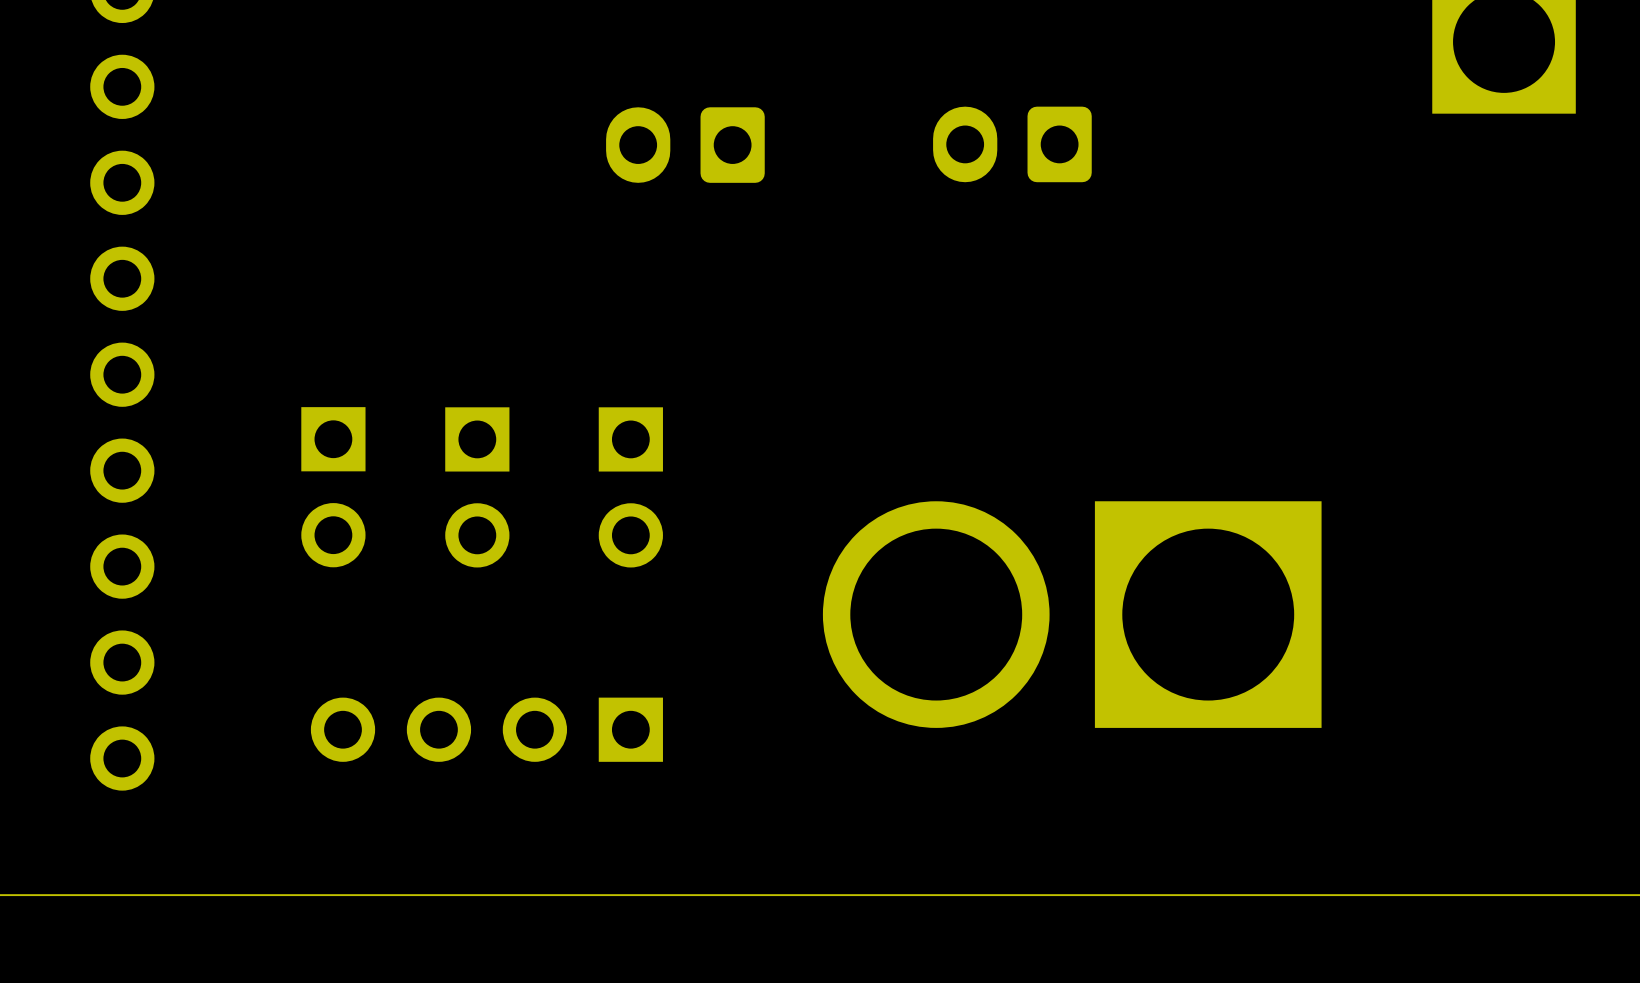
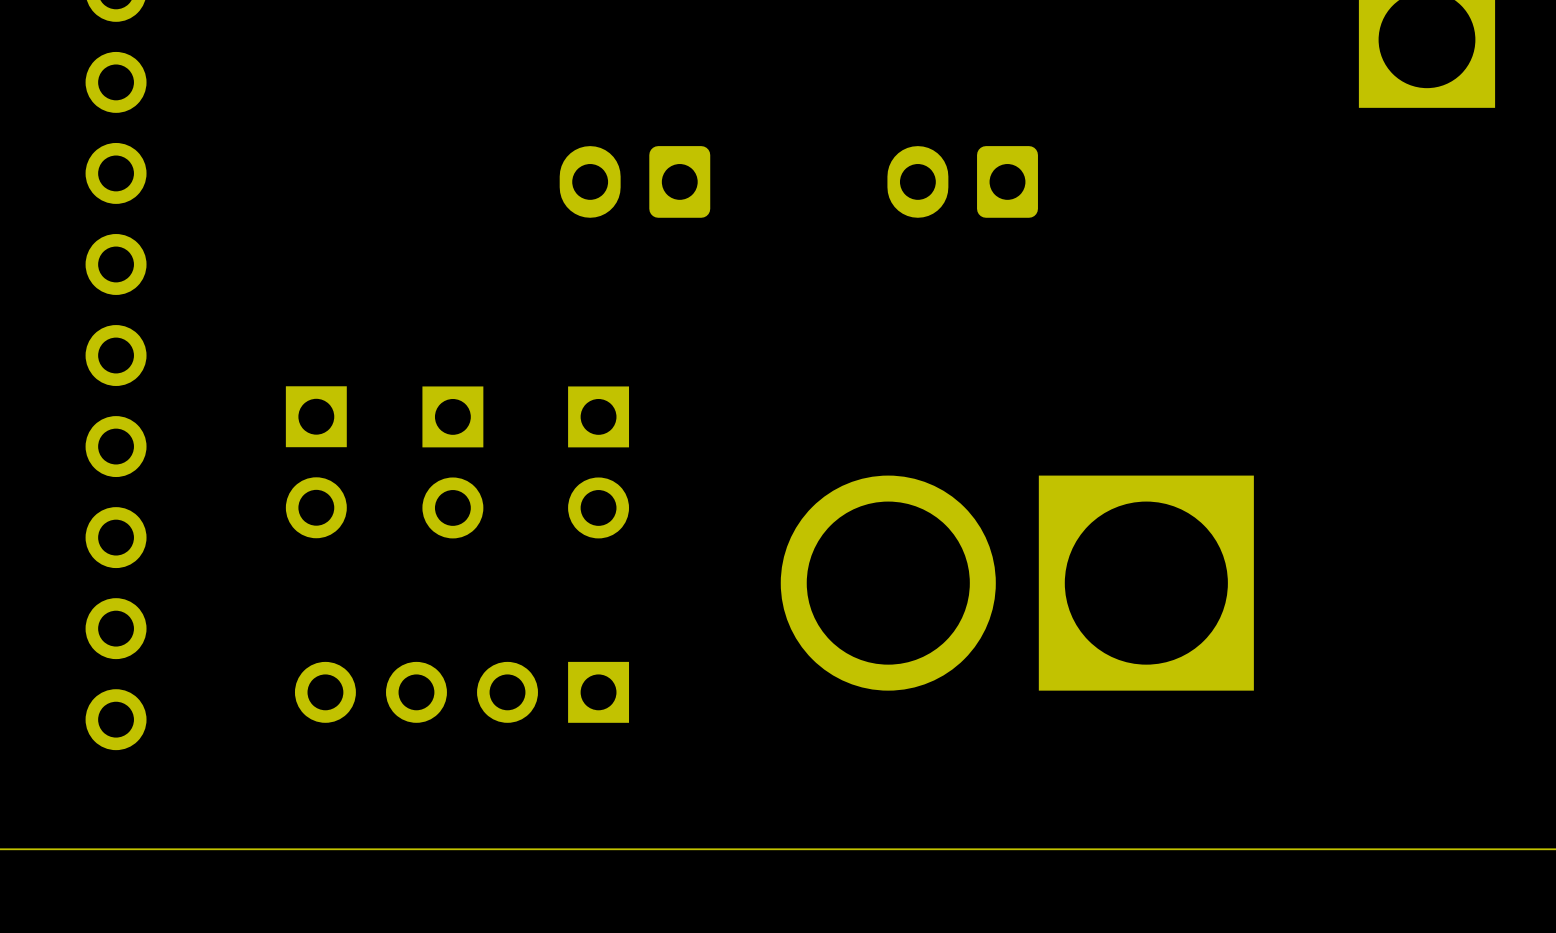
part position: (1012, 144) -> (962, 181)
part position: (685, 145) -> (634, 181)

